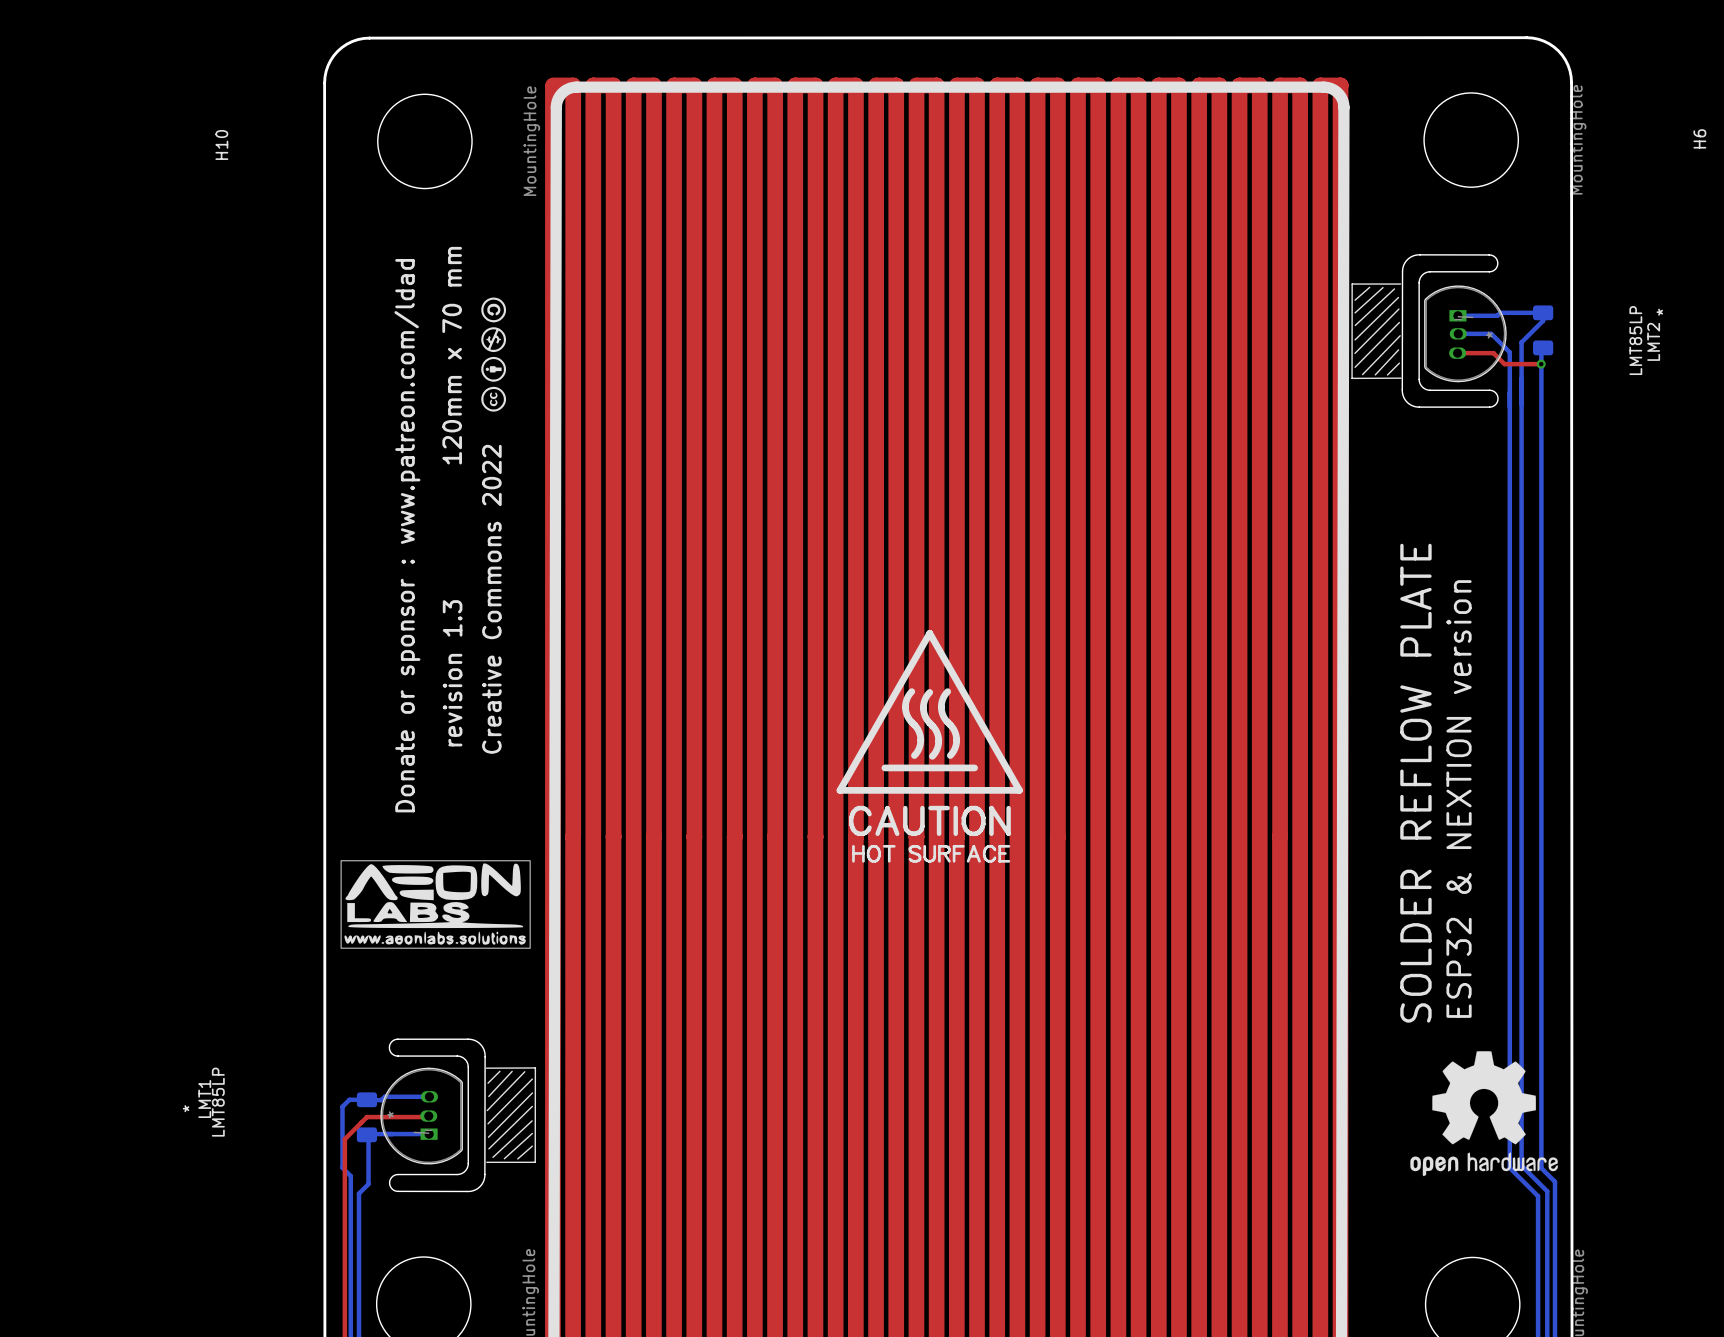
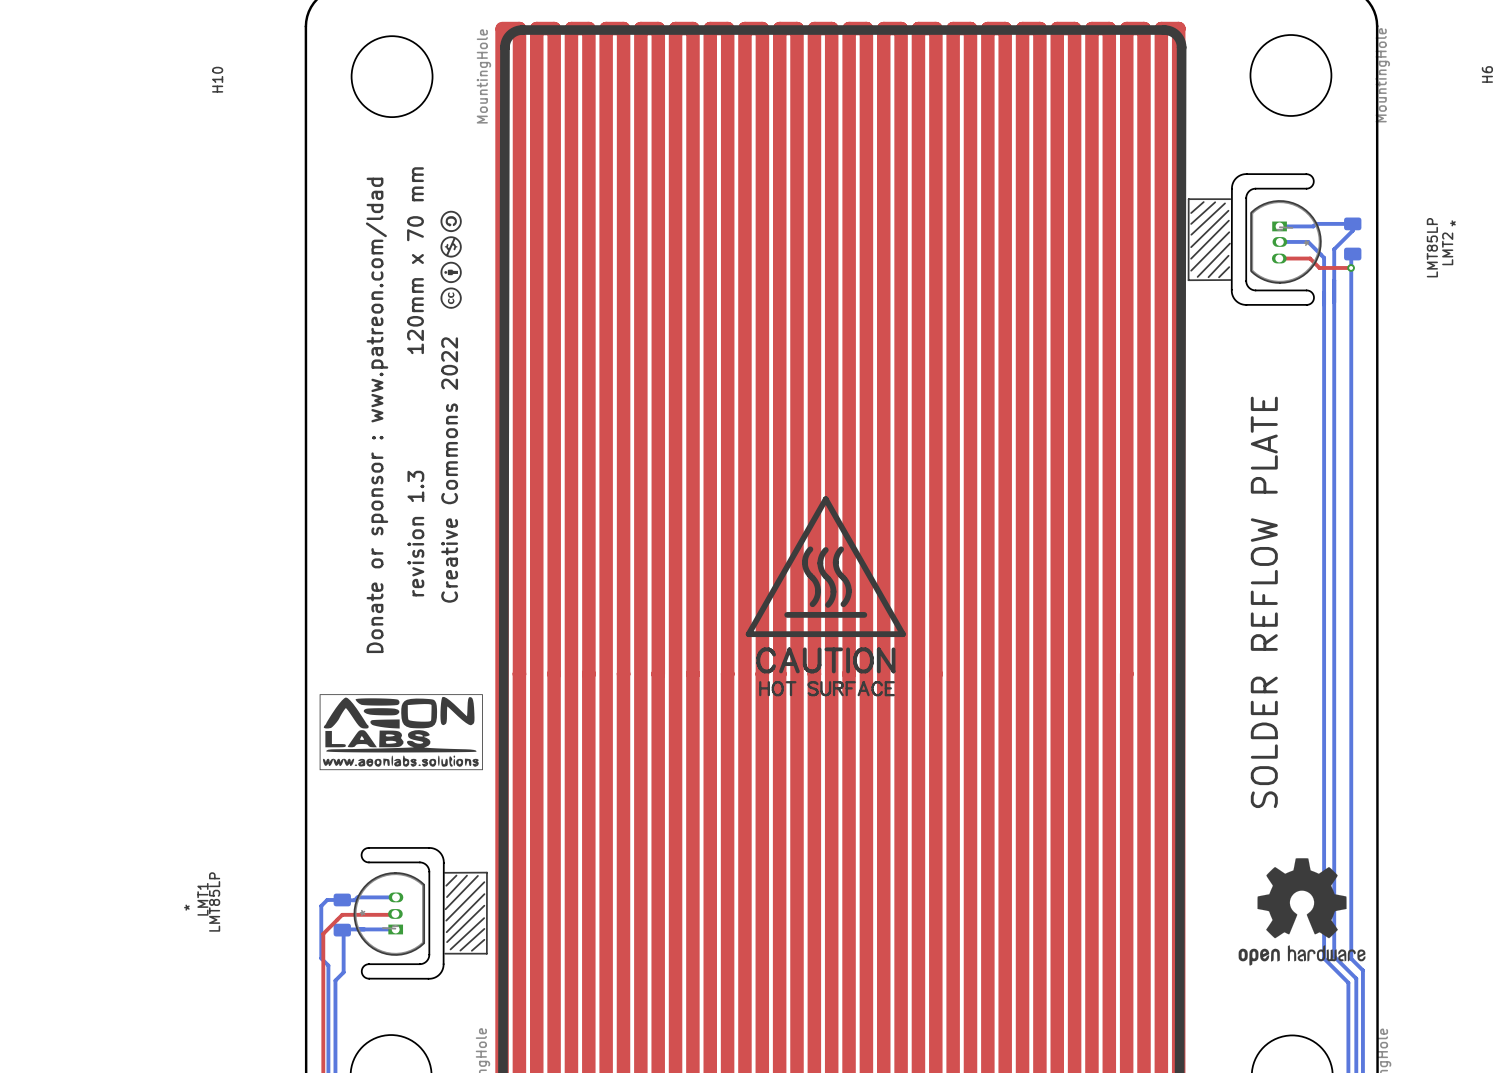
text position: SOLDER REFLOW PLATE (1415, 783) -> SOLDER REFLOW PLATE (1264, 602)
text: ESP32 & NEXTION version (1459, 799) -> none

